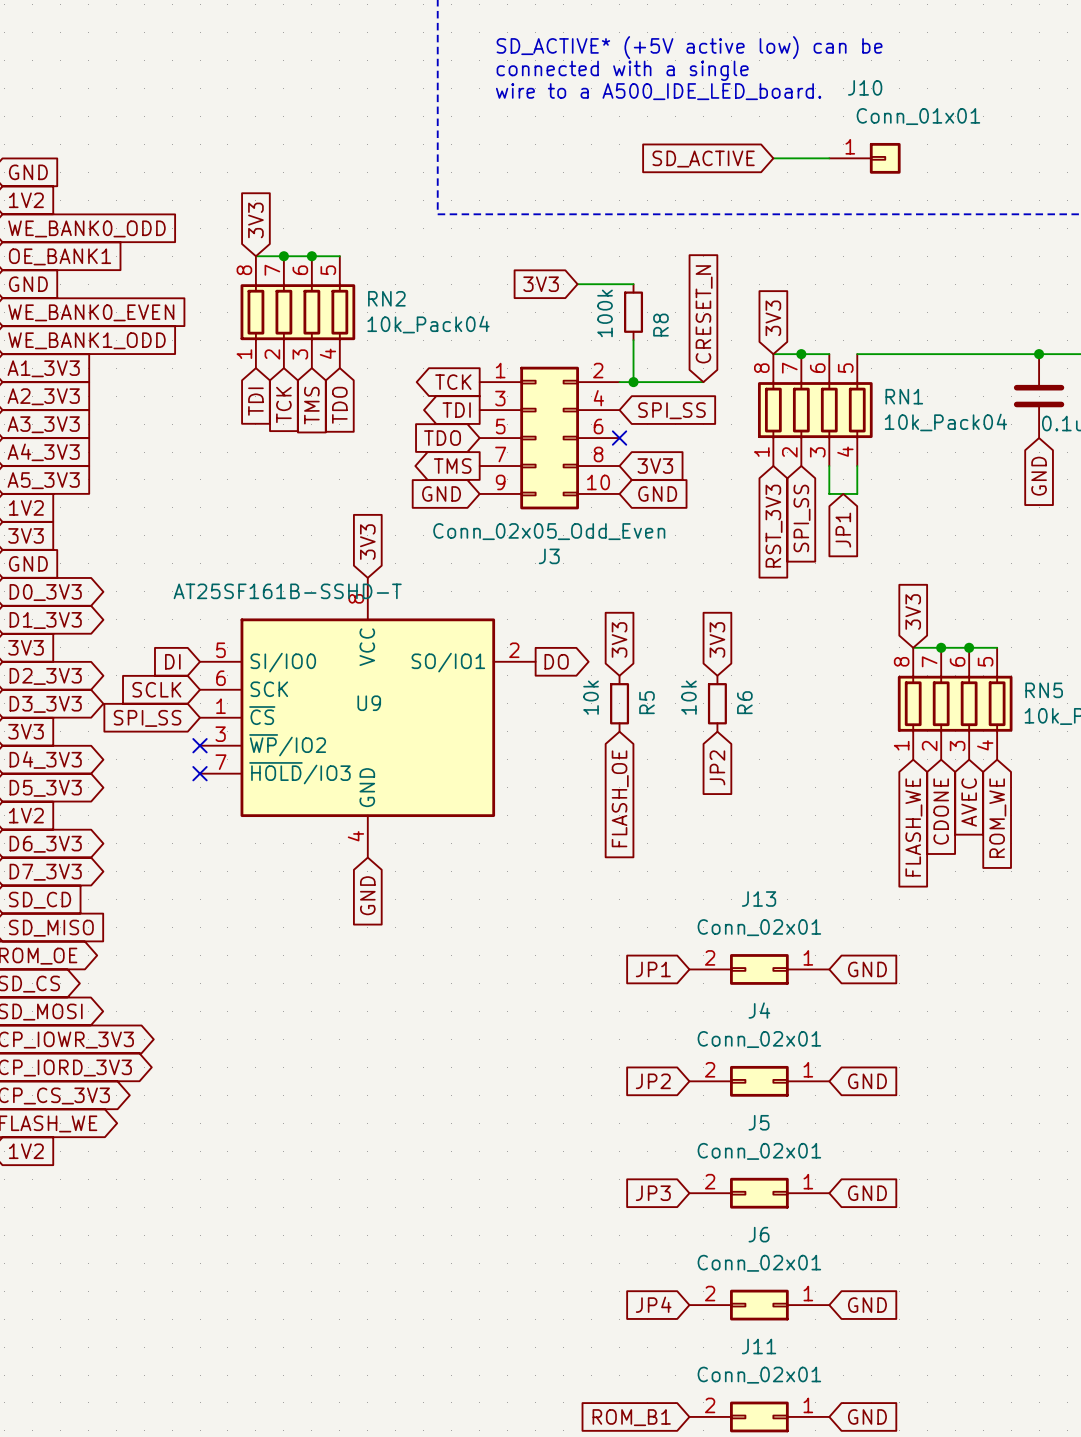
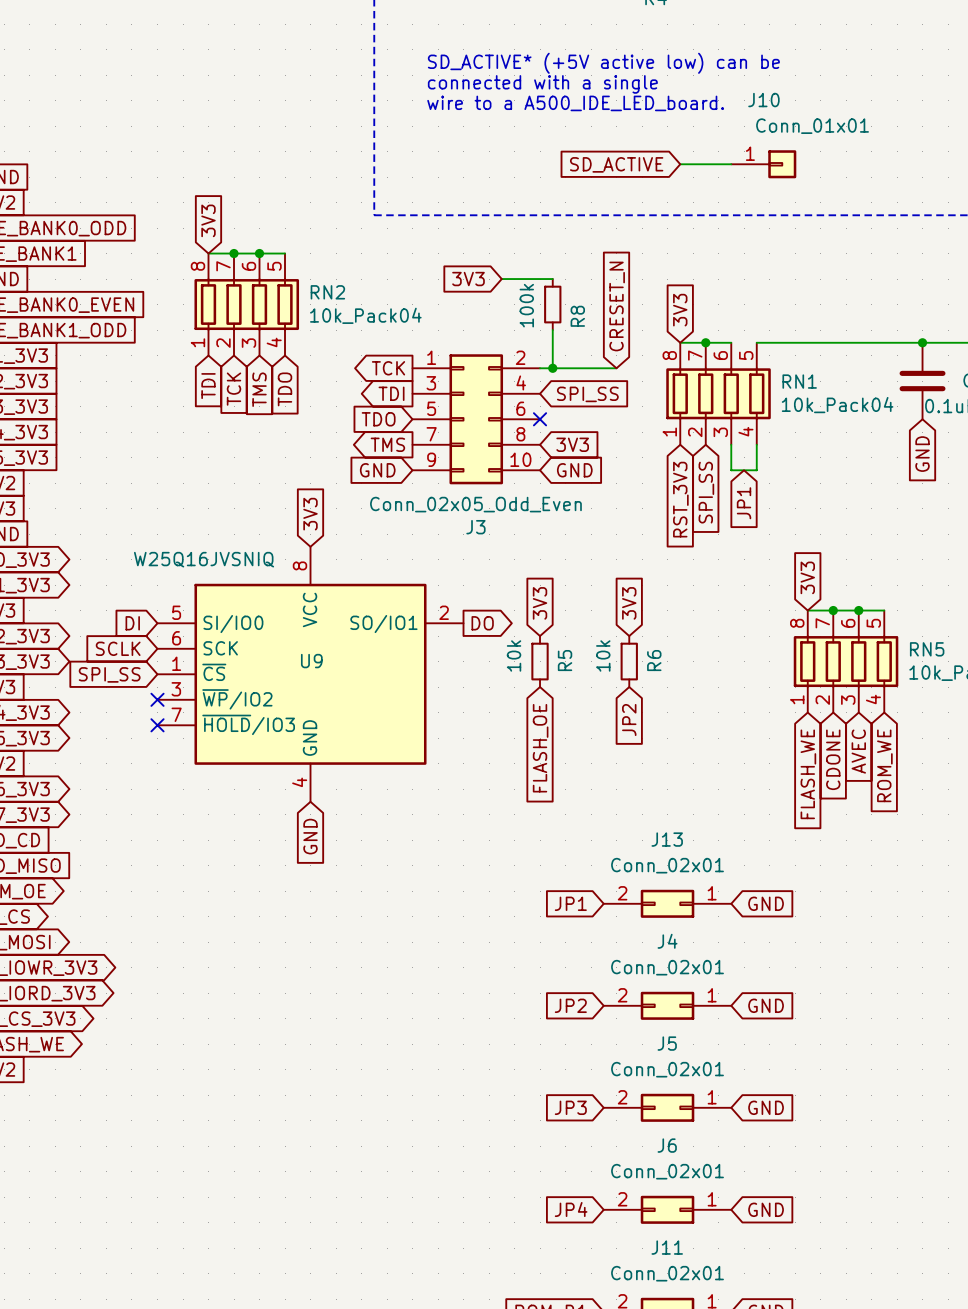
U9 value: AT25SF161B-SSHD-T (287, 591) -> W25Q16JVSNIQ (204, 559)

